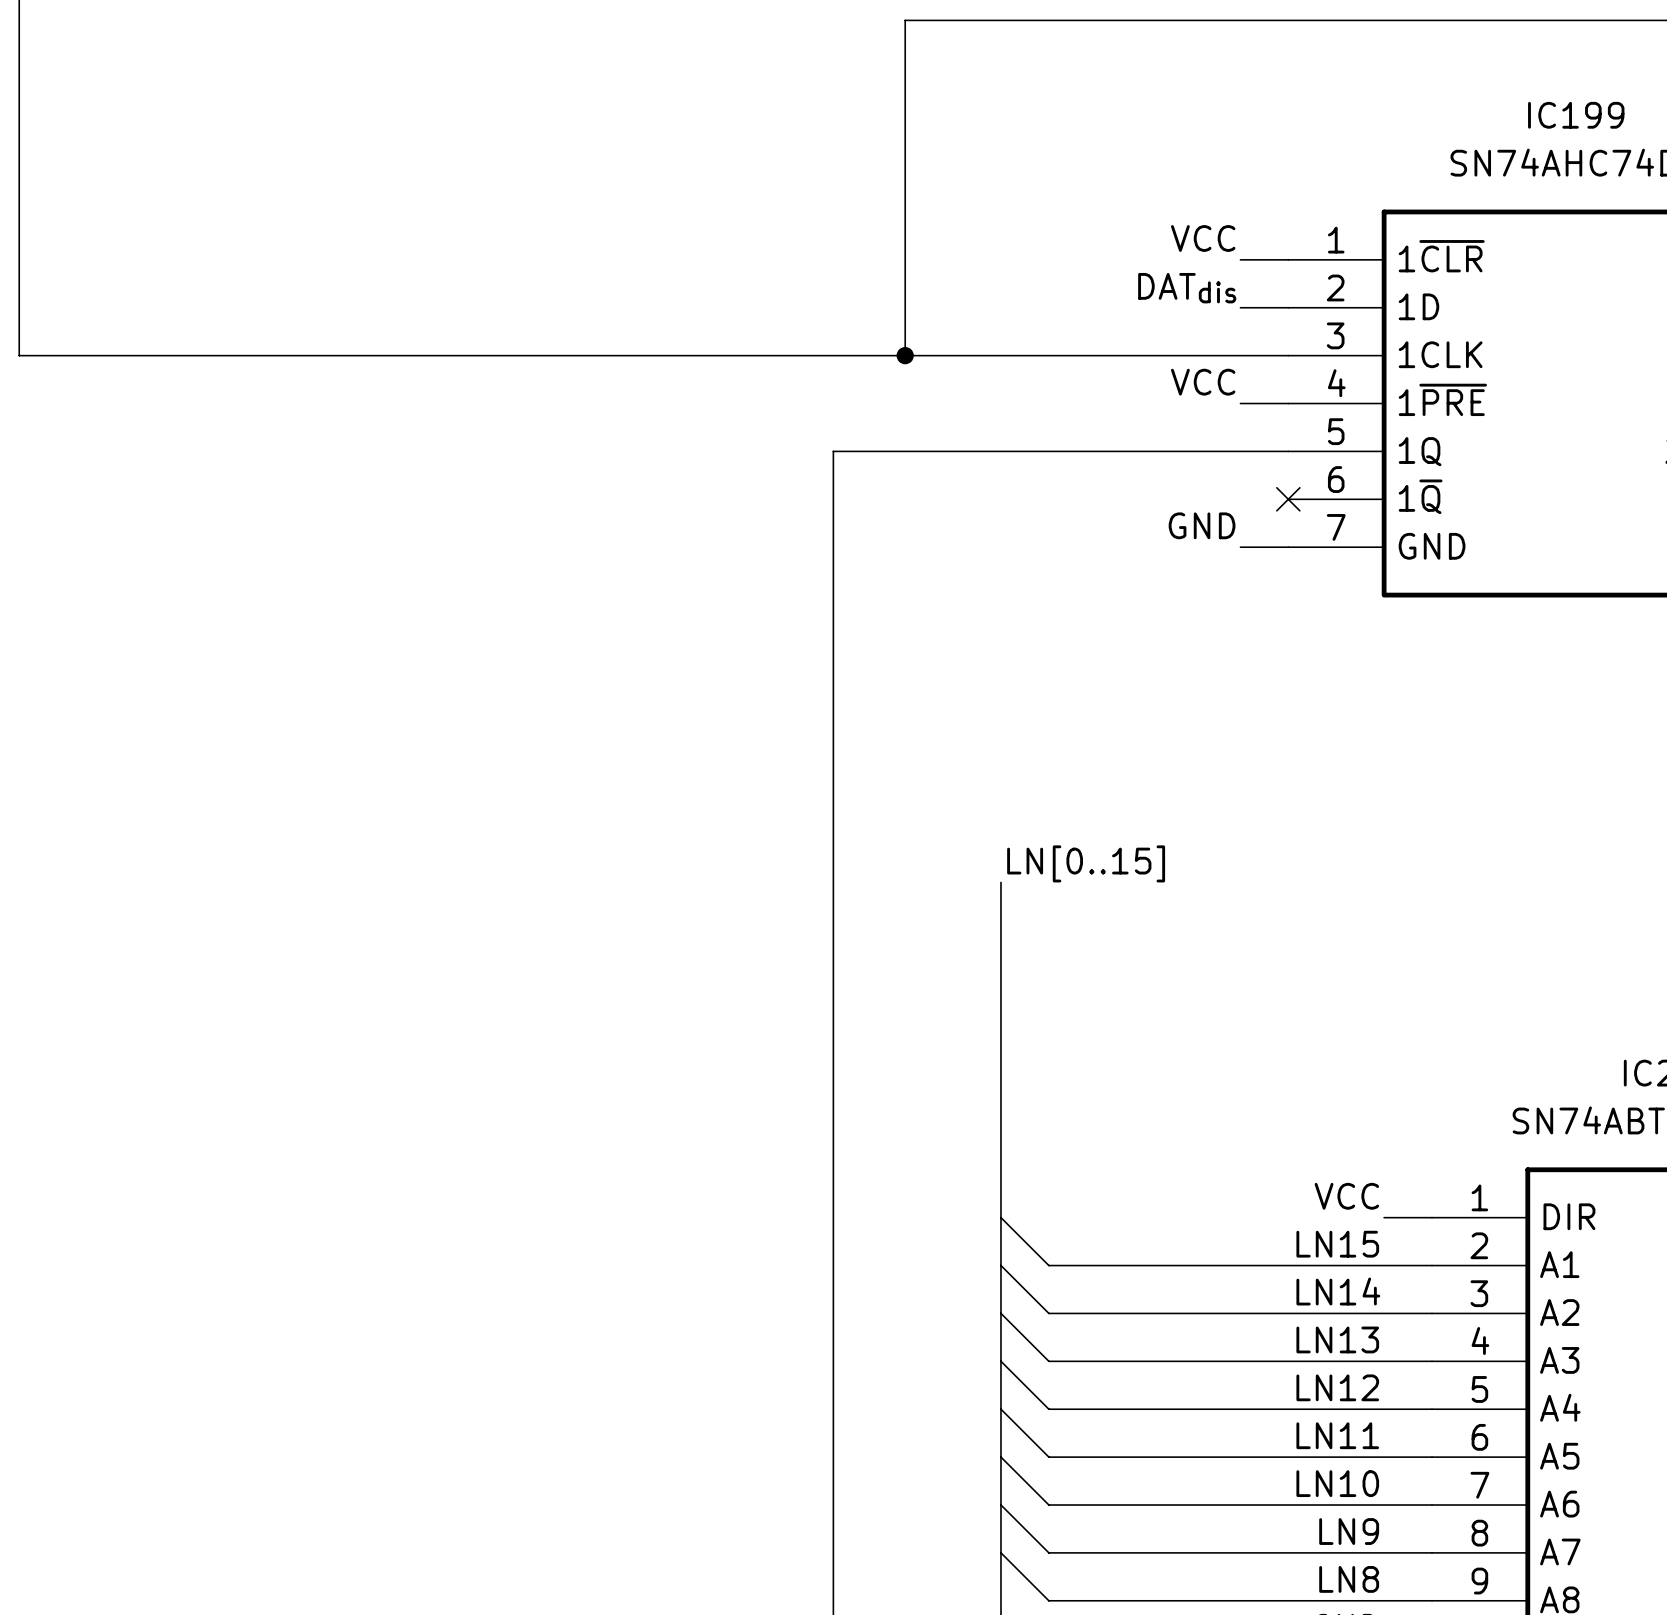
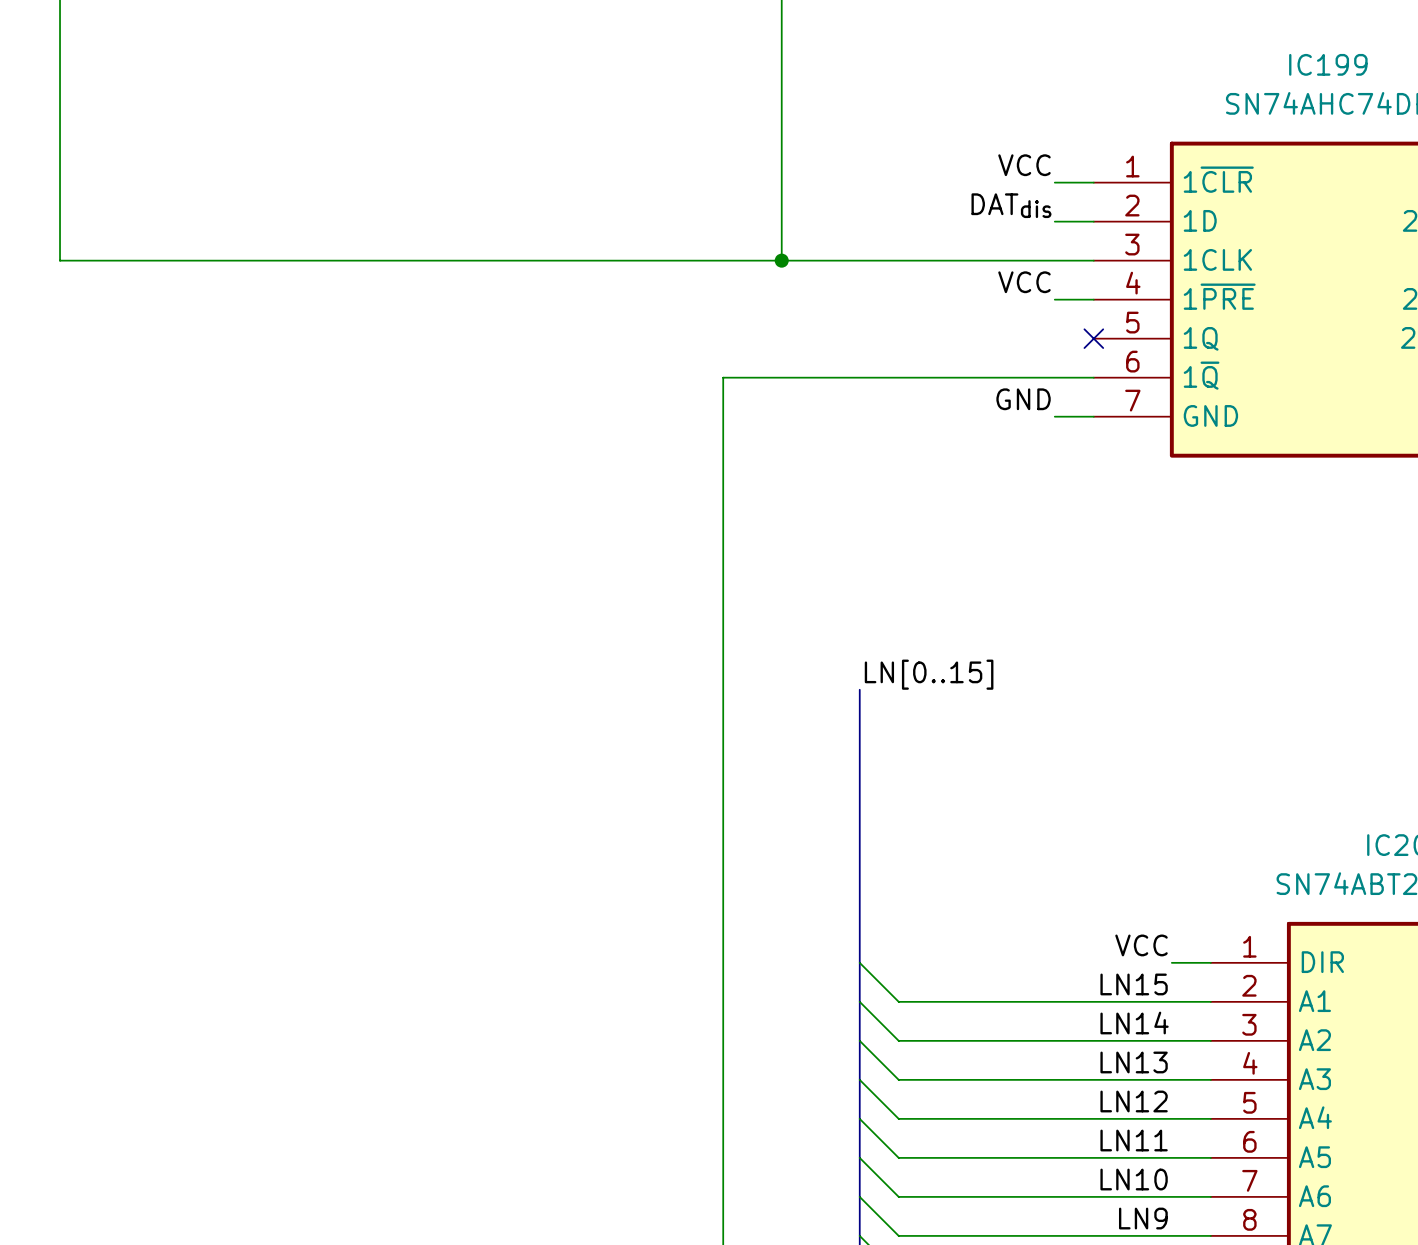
wire: (1288, 451) (833, 451) (833, 499) -> (1093, 377) (723, 377)
no-connect mark position: (1288, 499) -> (1093, 338)

